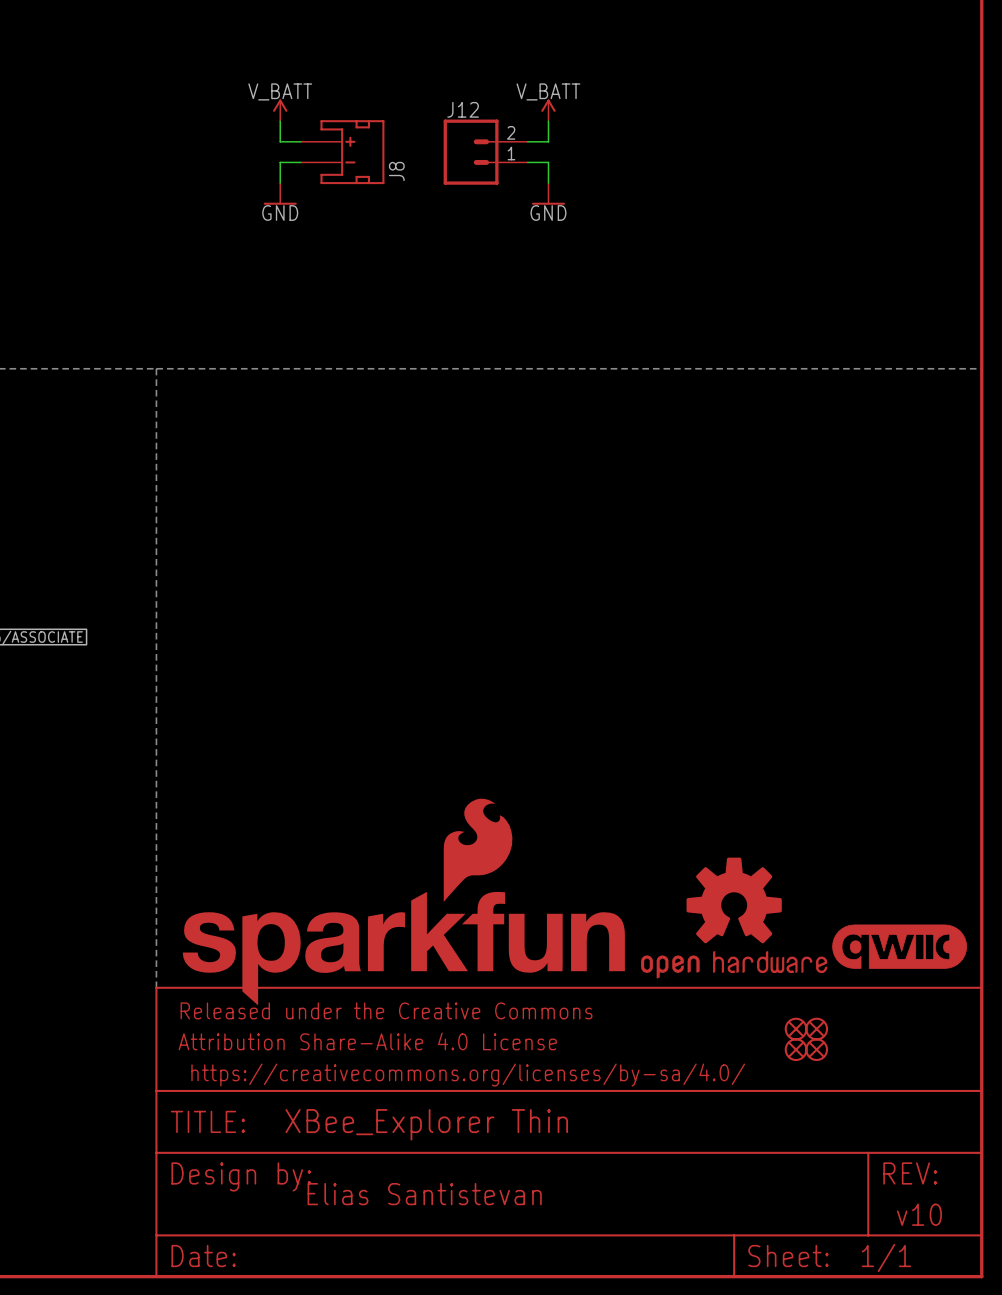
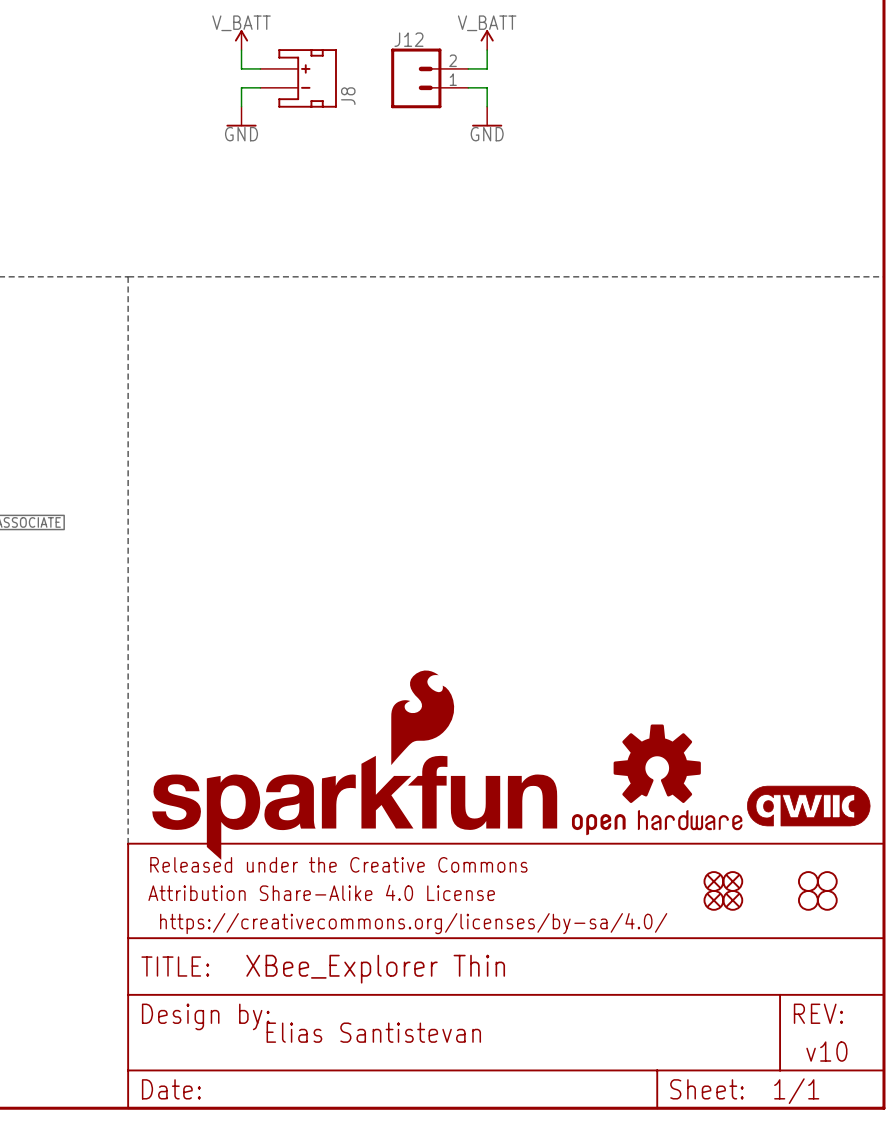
part: none -> (808, 881)
part: none -> (827, 881)
part: none -> (808, 900)
part: none -> (827, 900)

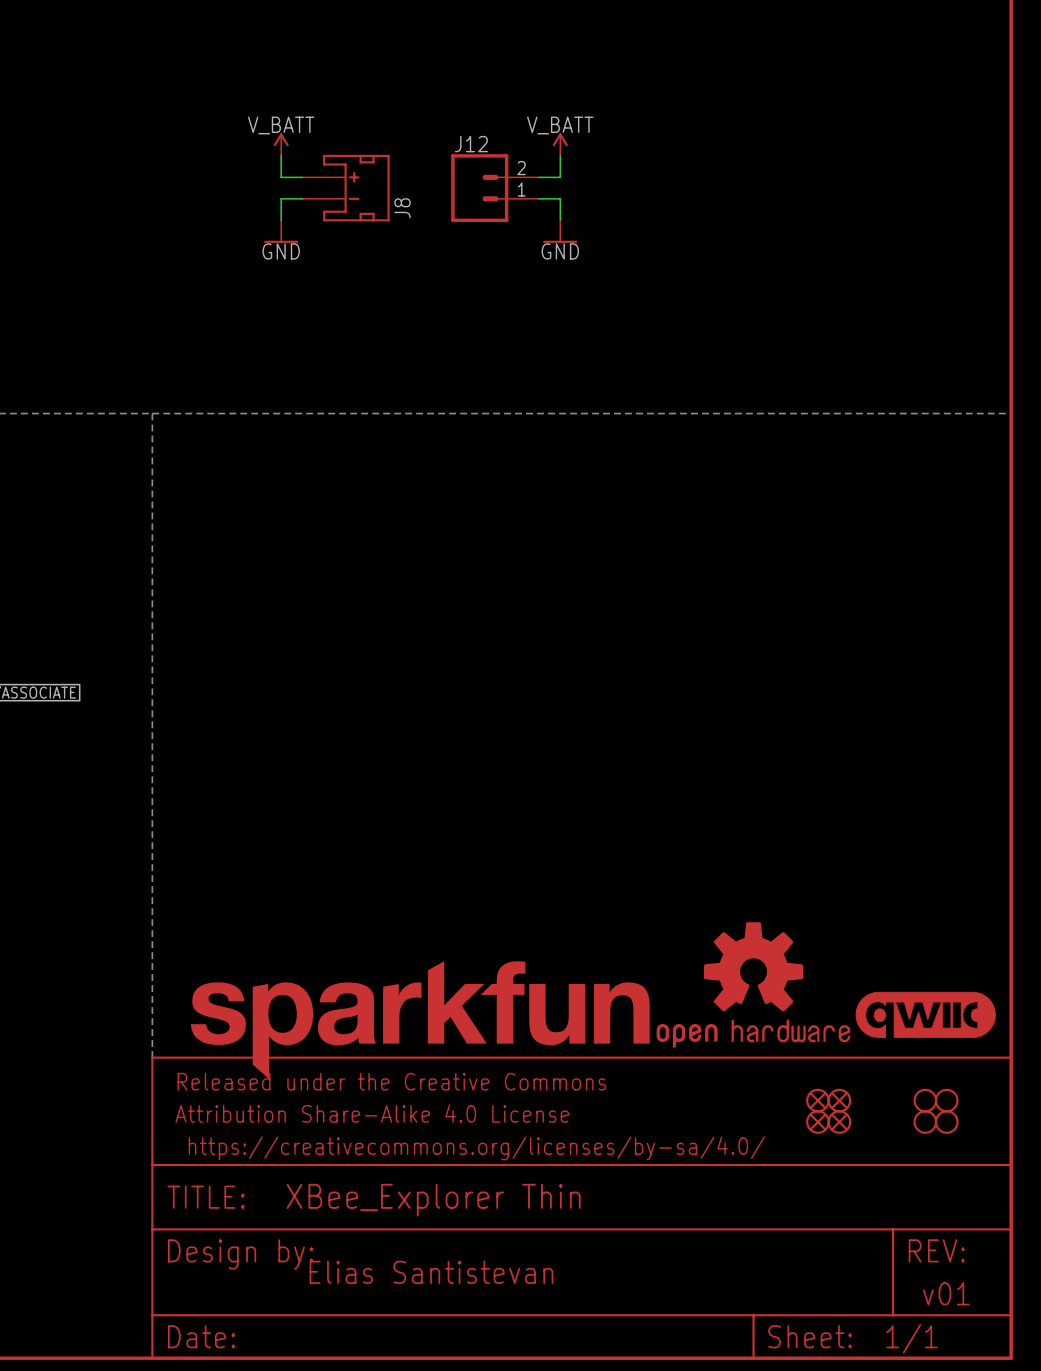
part: (354, 765) -> none
part: none -> (420, 1020)
text: v10 (826, 1051) -> v01 (946, 1293)

